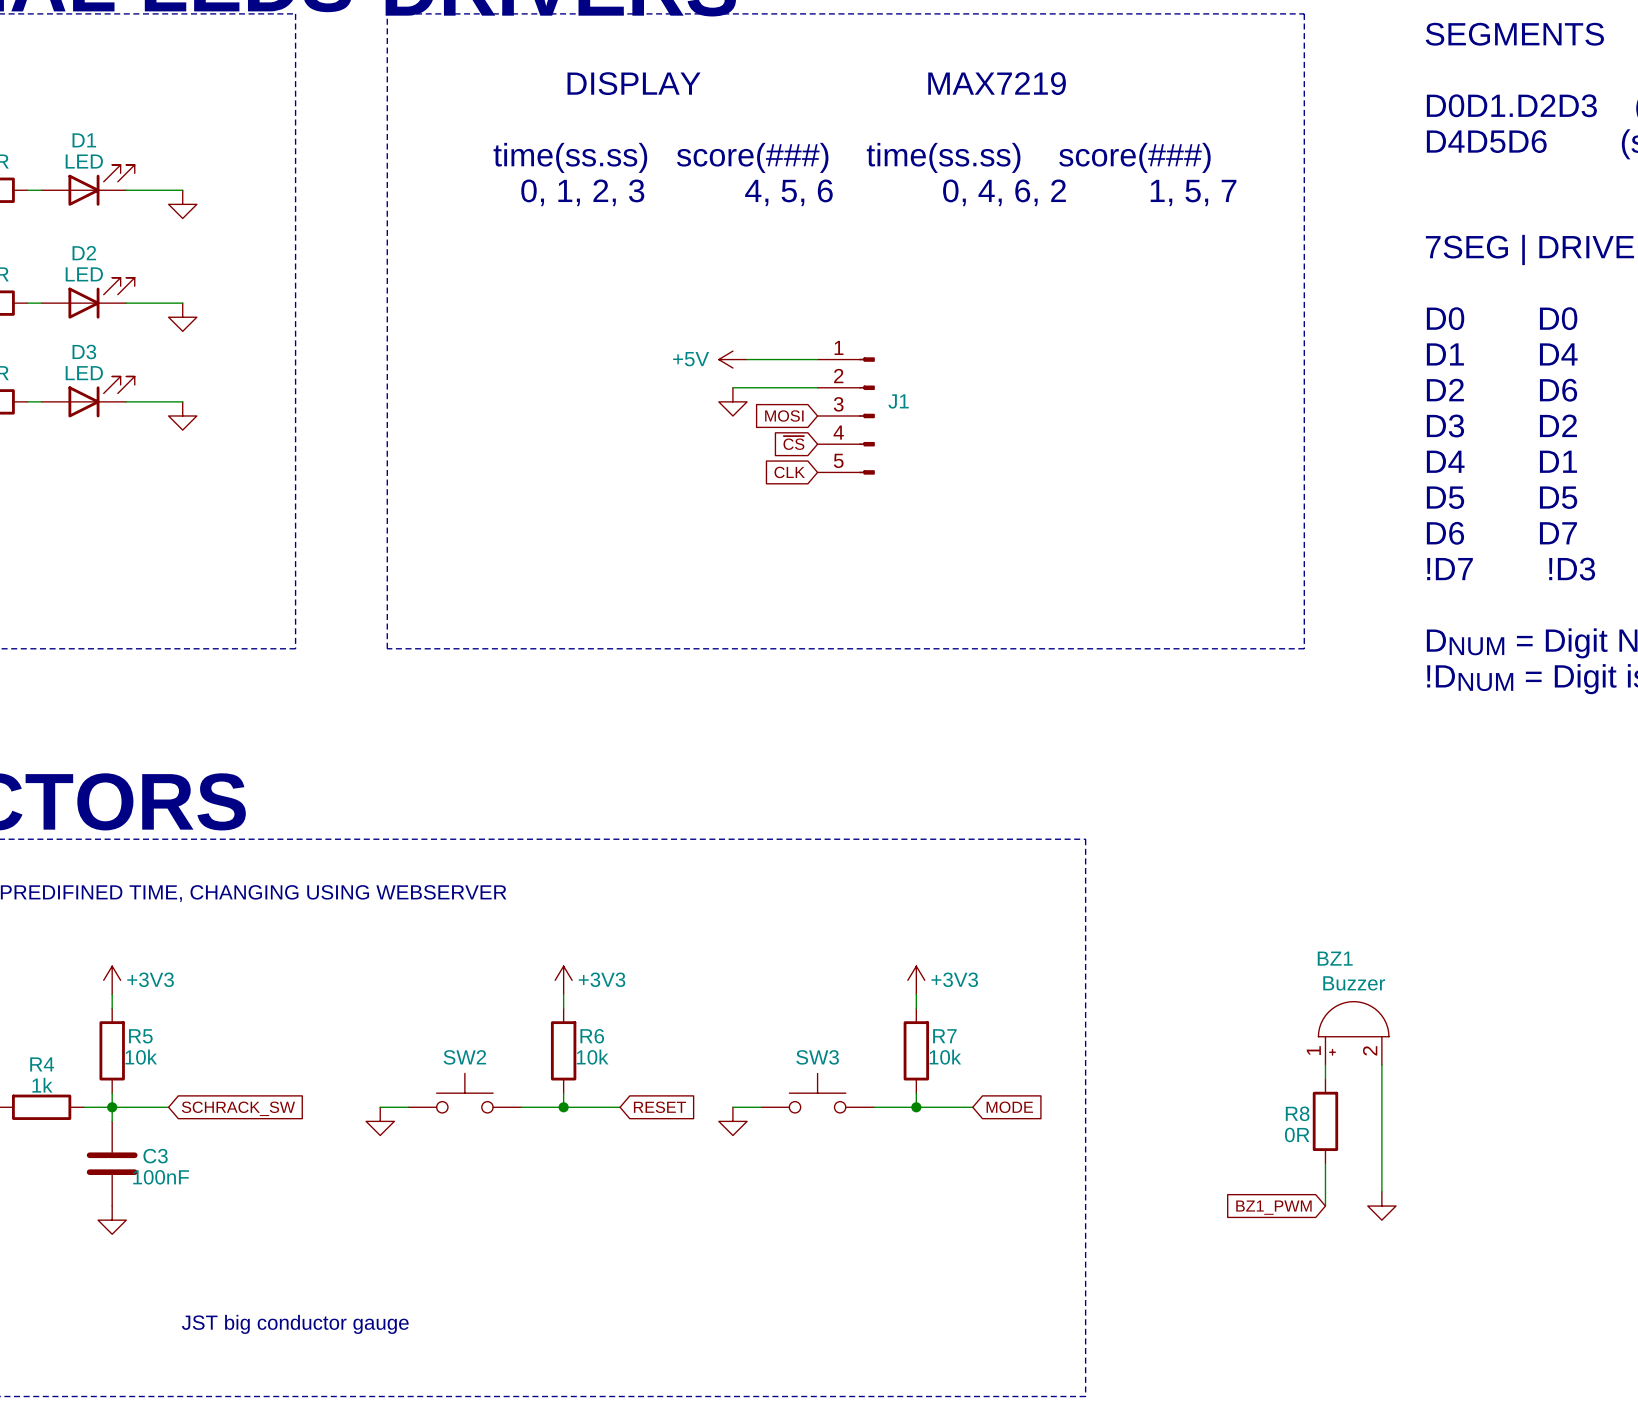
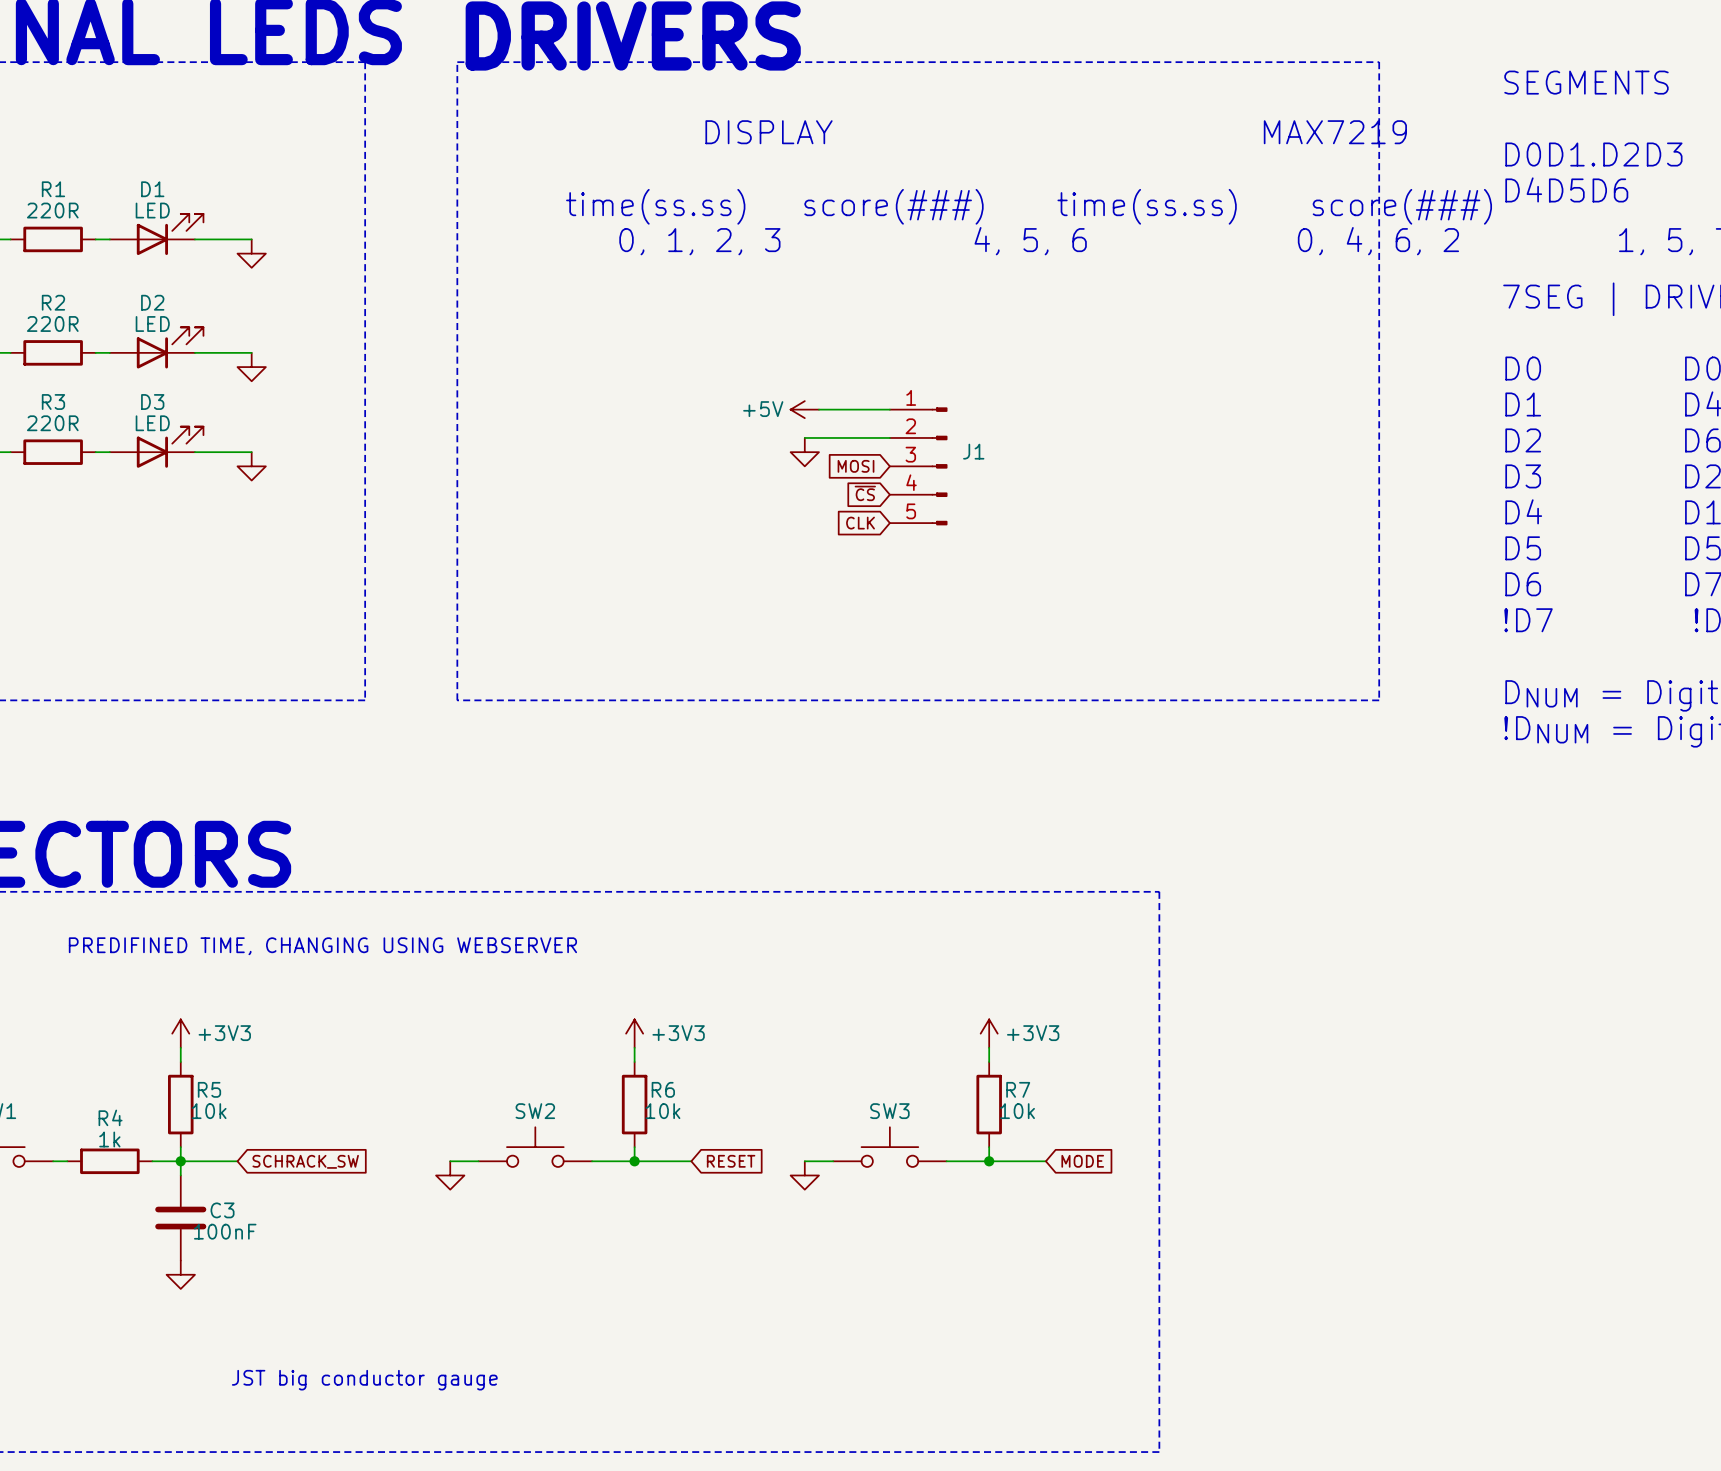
BZ1: Buzzer (1353, 1033) -> none
wire: (1325, 1064) (1325, 1079) -> none
wire: (1381, 1064) (1381, 1191) -> none
R8: 0R (1325, 1121) -> none
wire: (1325, 1163) (1325, 1206) -> none
power symbol: (1381, 1206) -> none
global label: BZ1_PWM (1273, 1207) -> none

